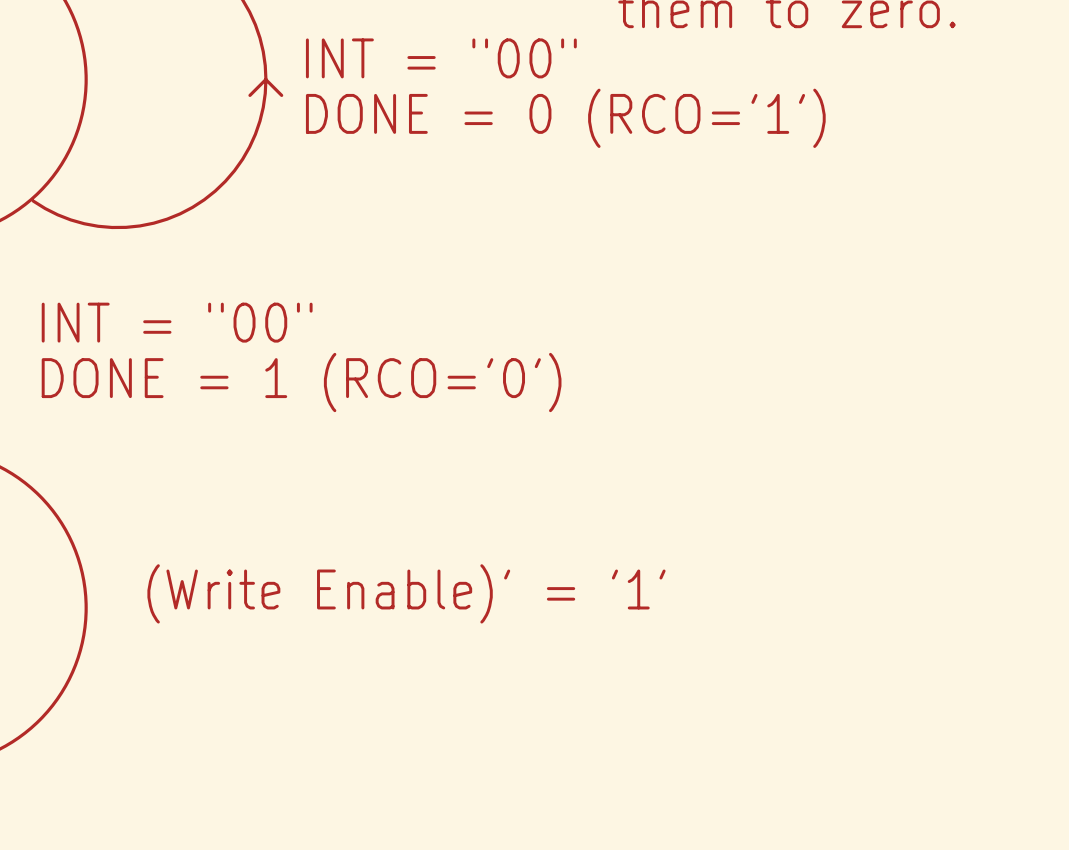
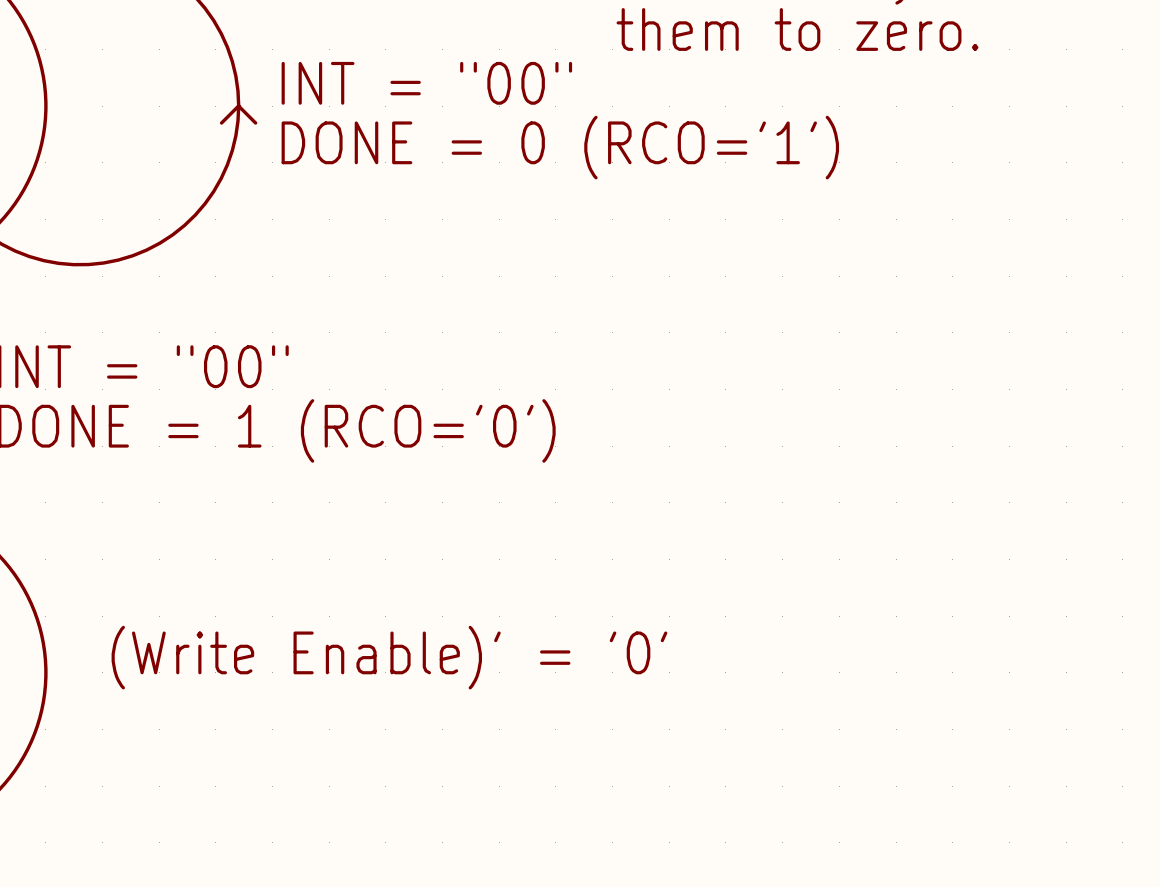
text: (Write Enable)' = '1' (406, 593) -> (Write Enable)' = '0' (389, 657)

